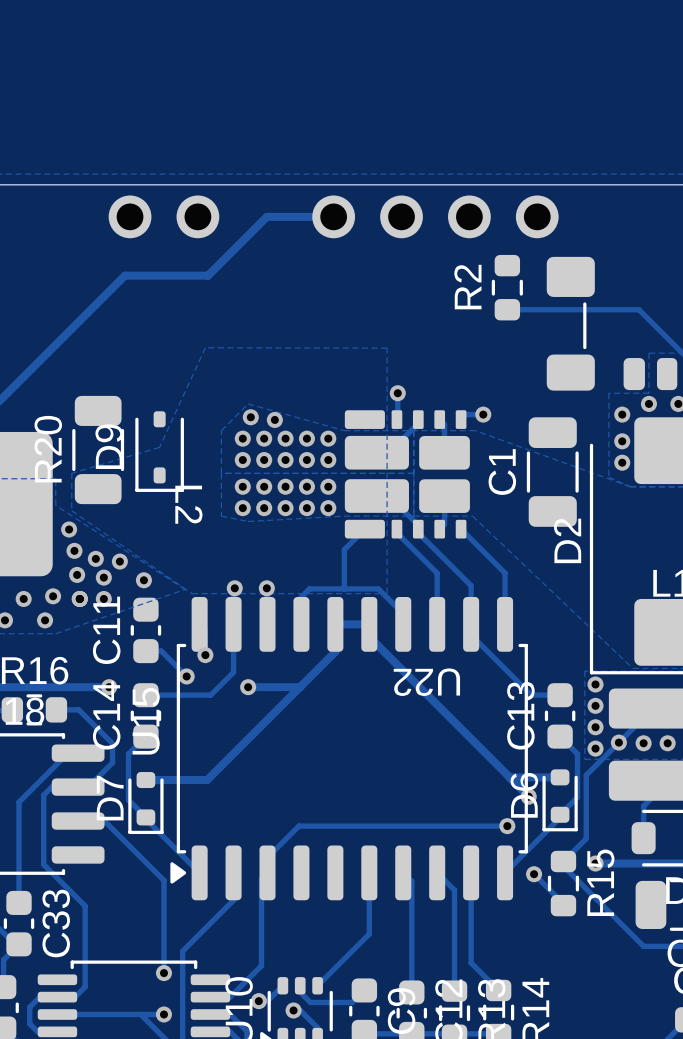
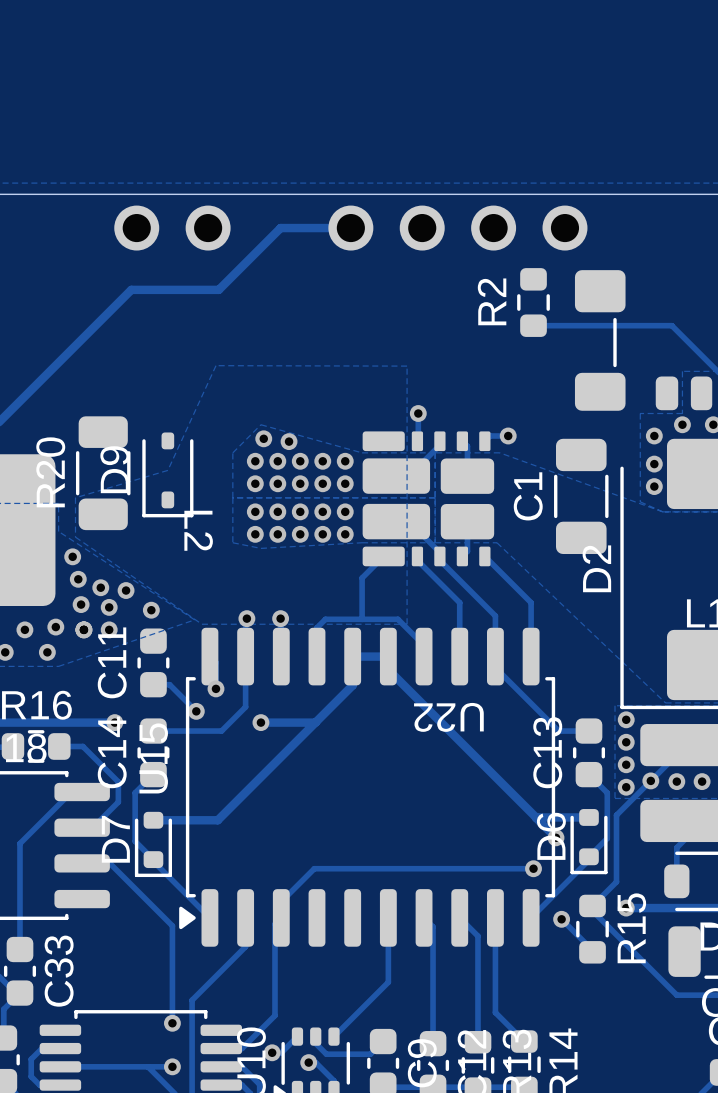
track: (78, 787) (51, 787) (43, 795) (43, 864) (85, 906) (85, 986) (75, 997) (57, 997) -> none

